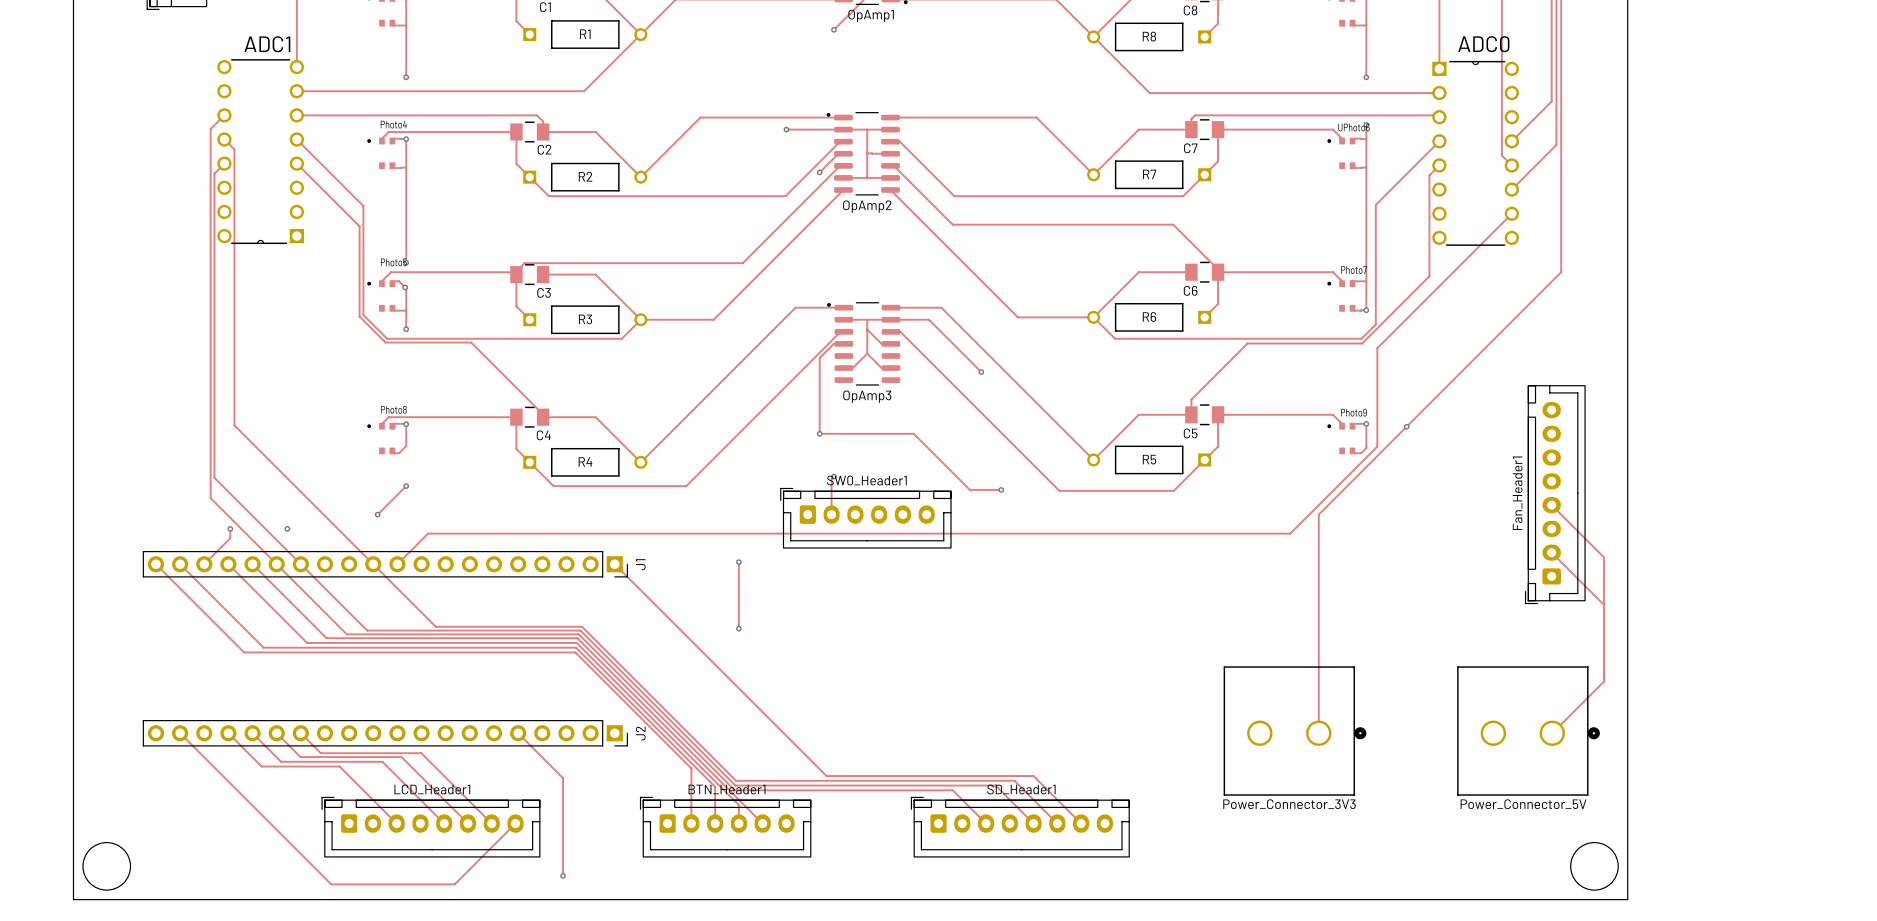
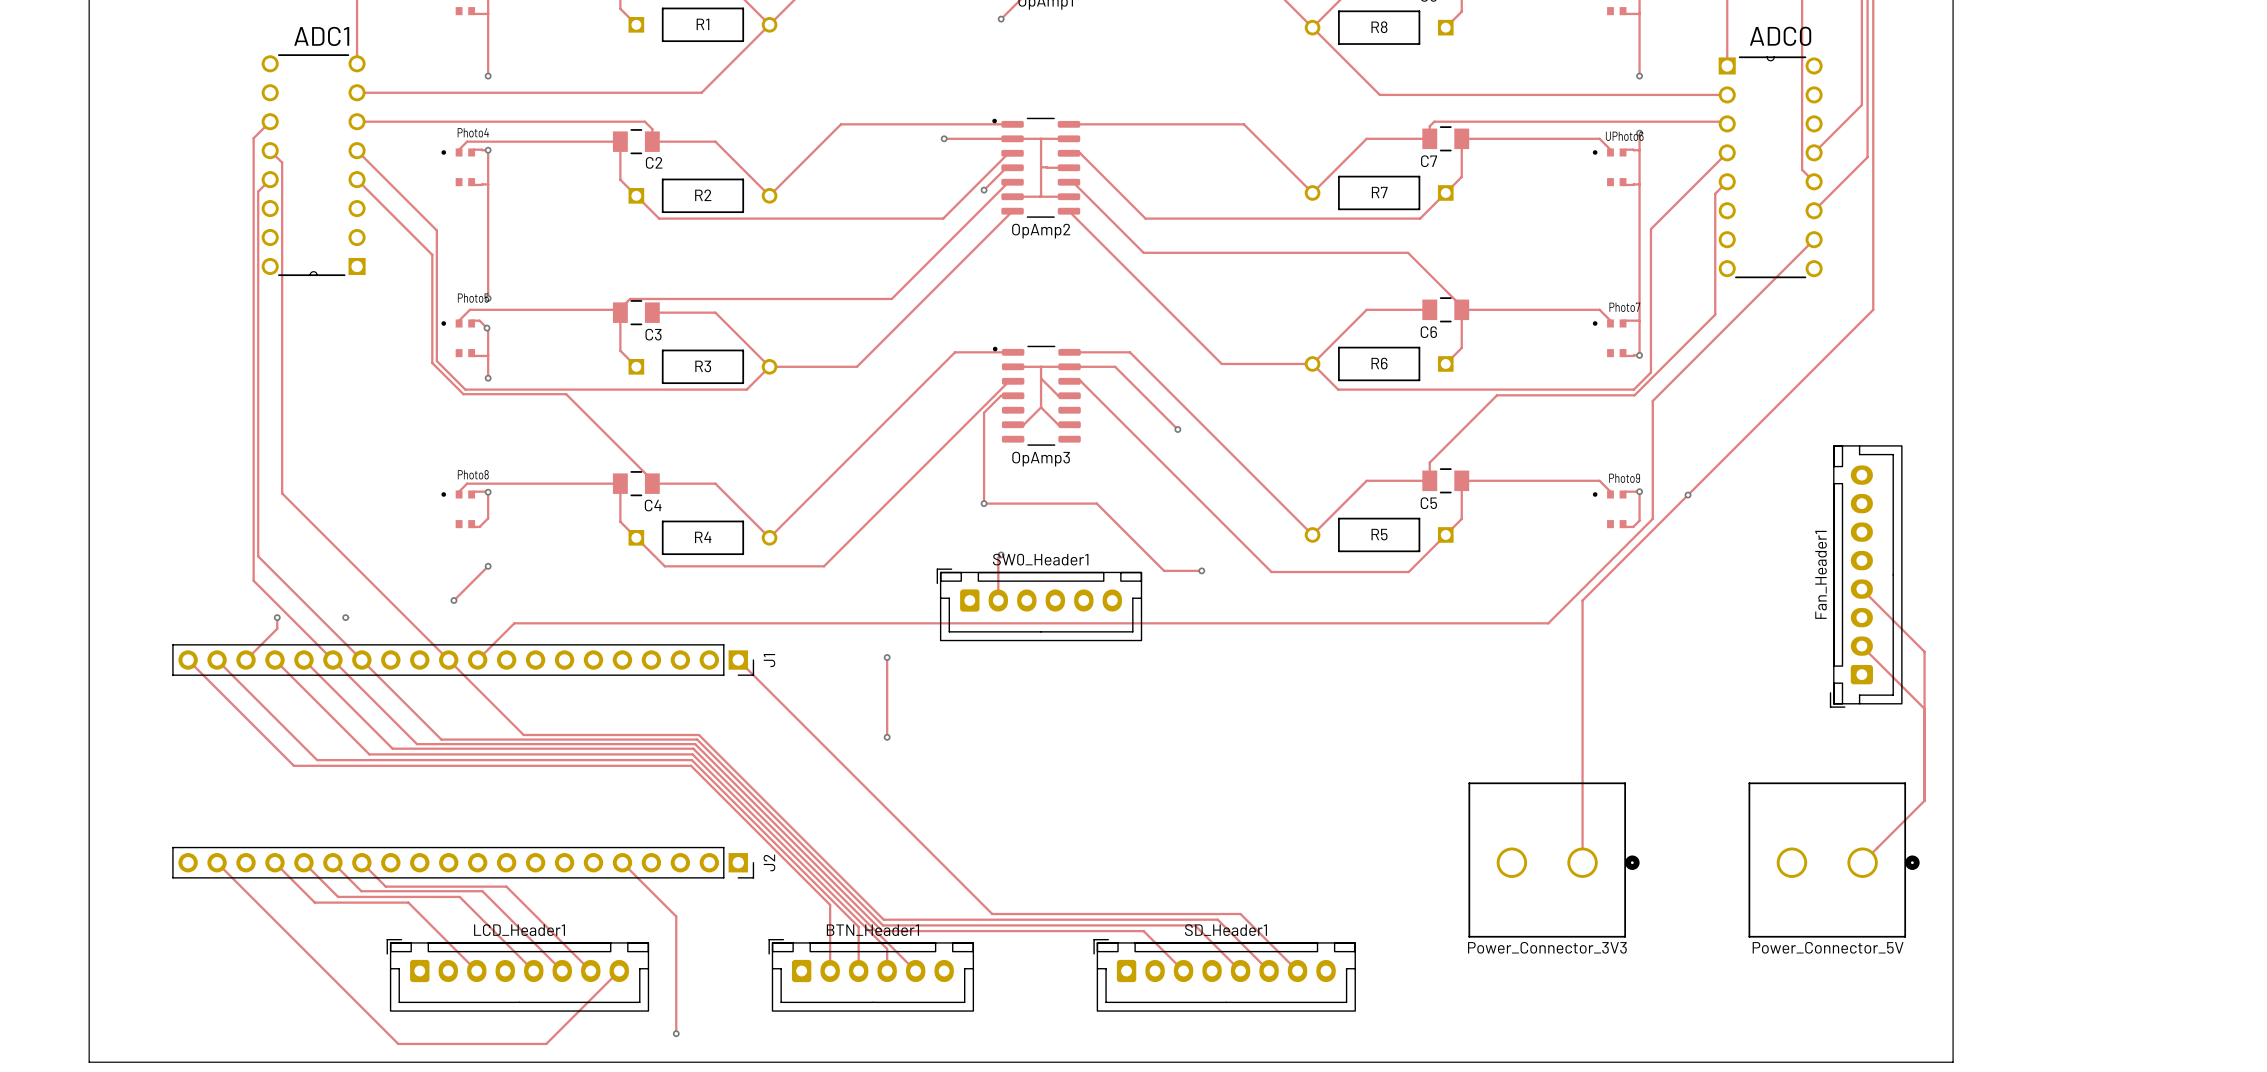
round board edge: [82, 842, 131, 891] -> none
round board edge: [1570, 842, 1619, 891] -> none

